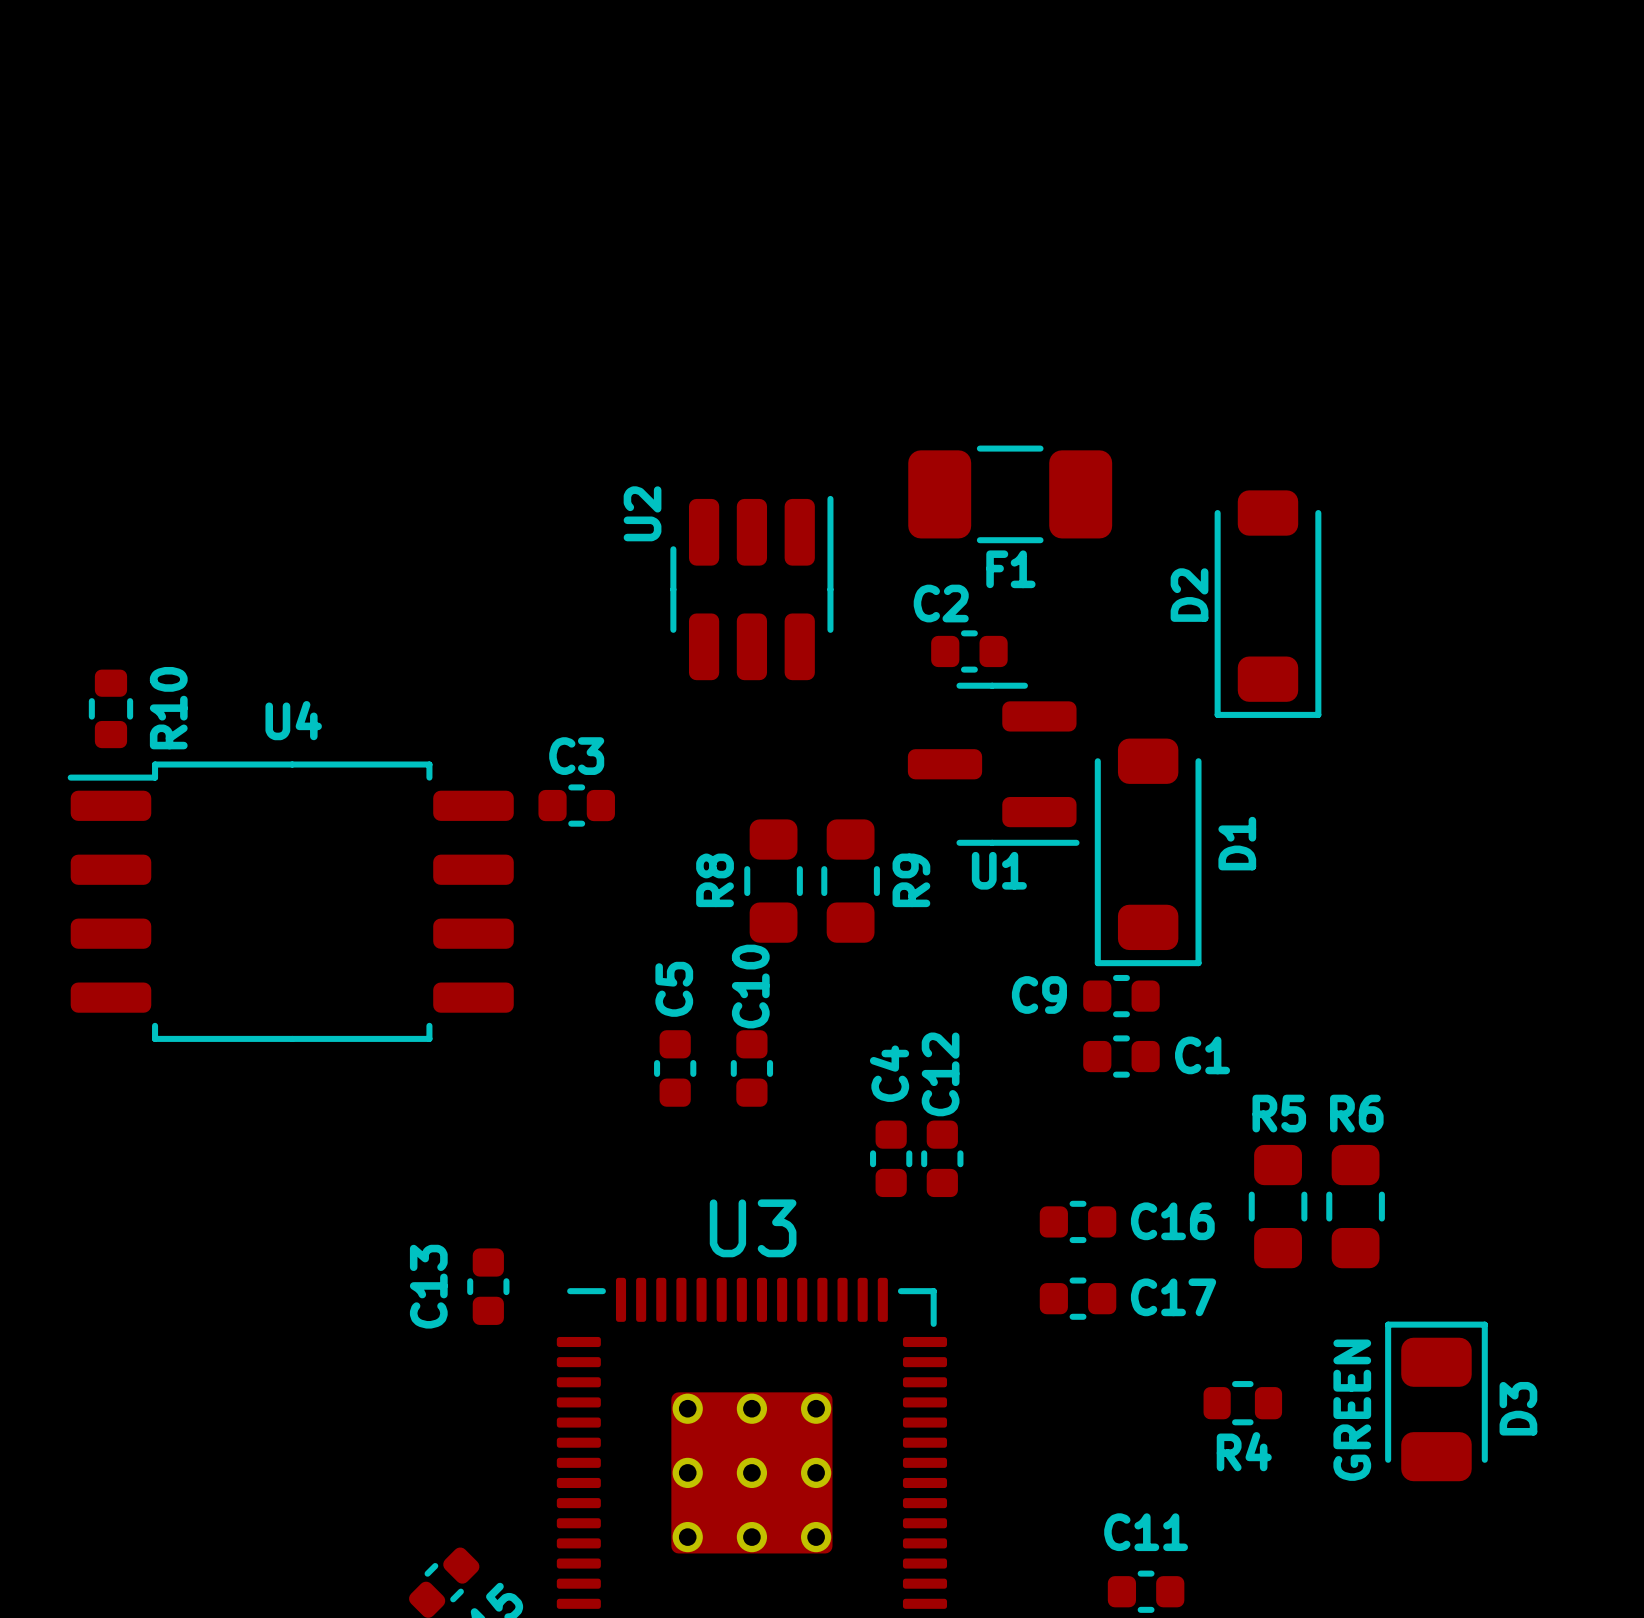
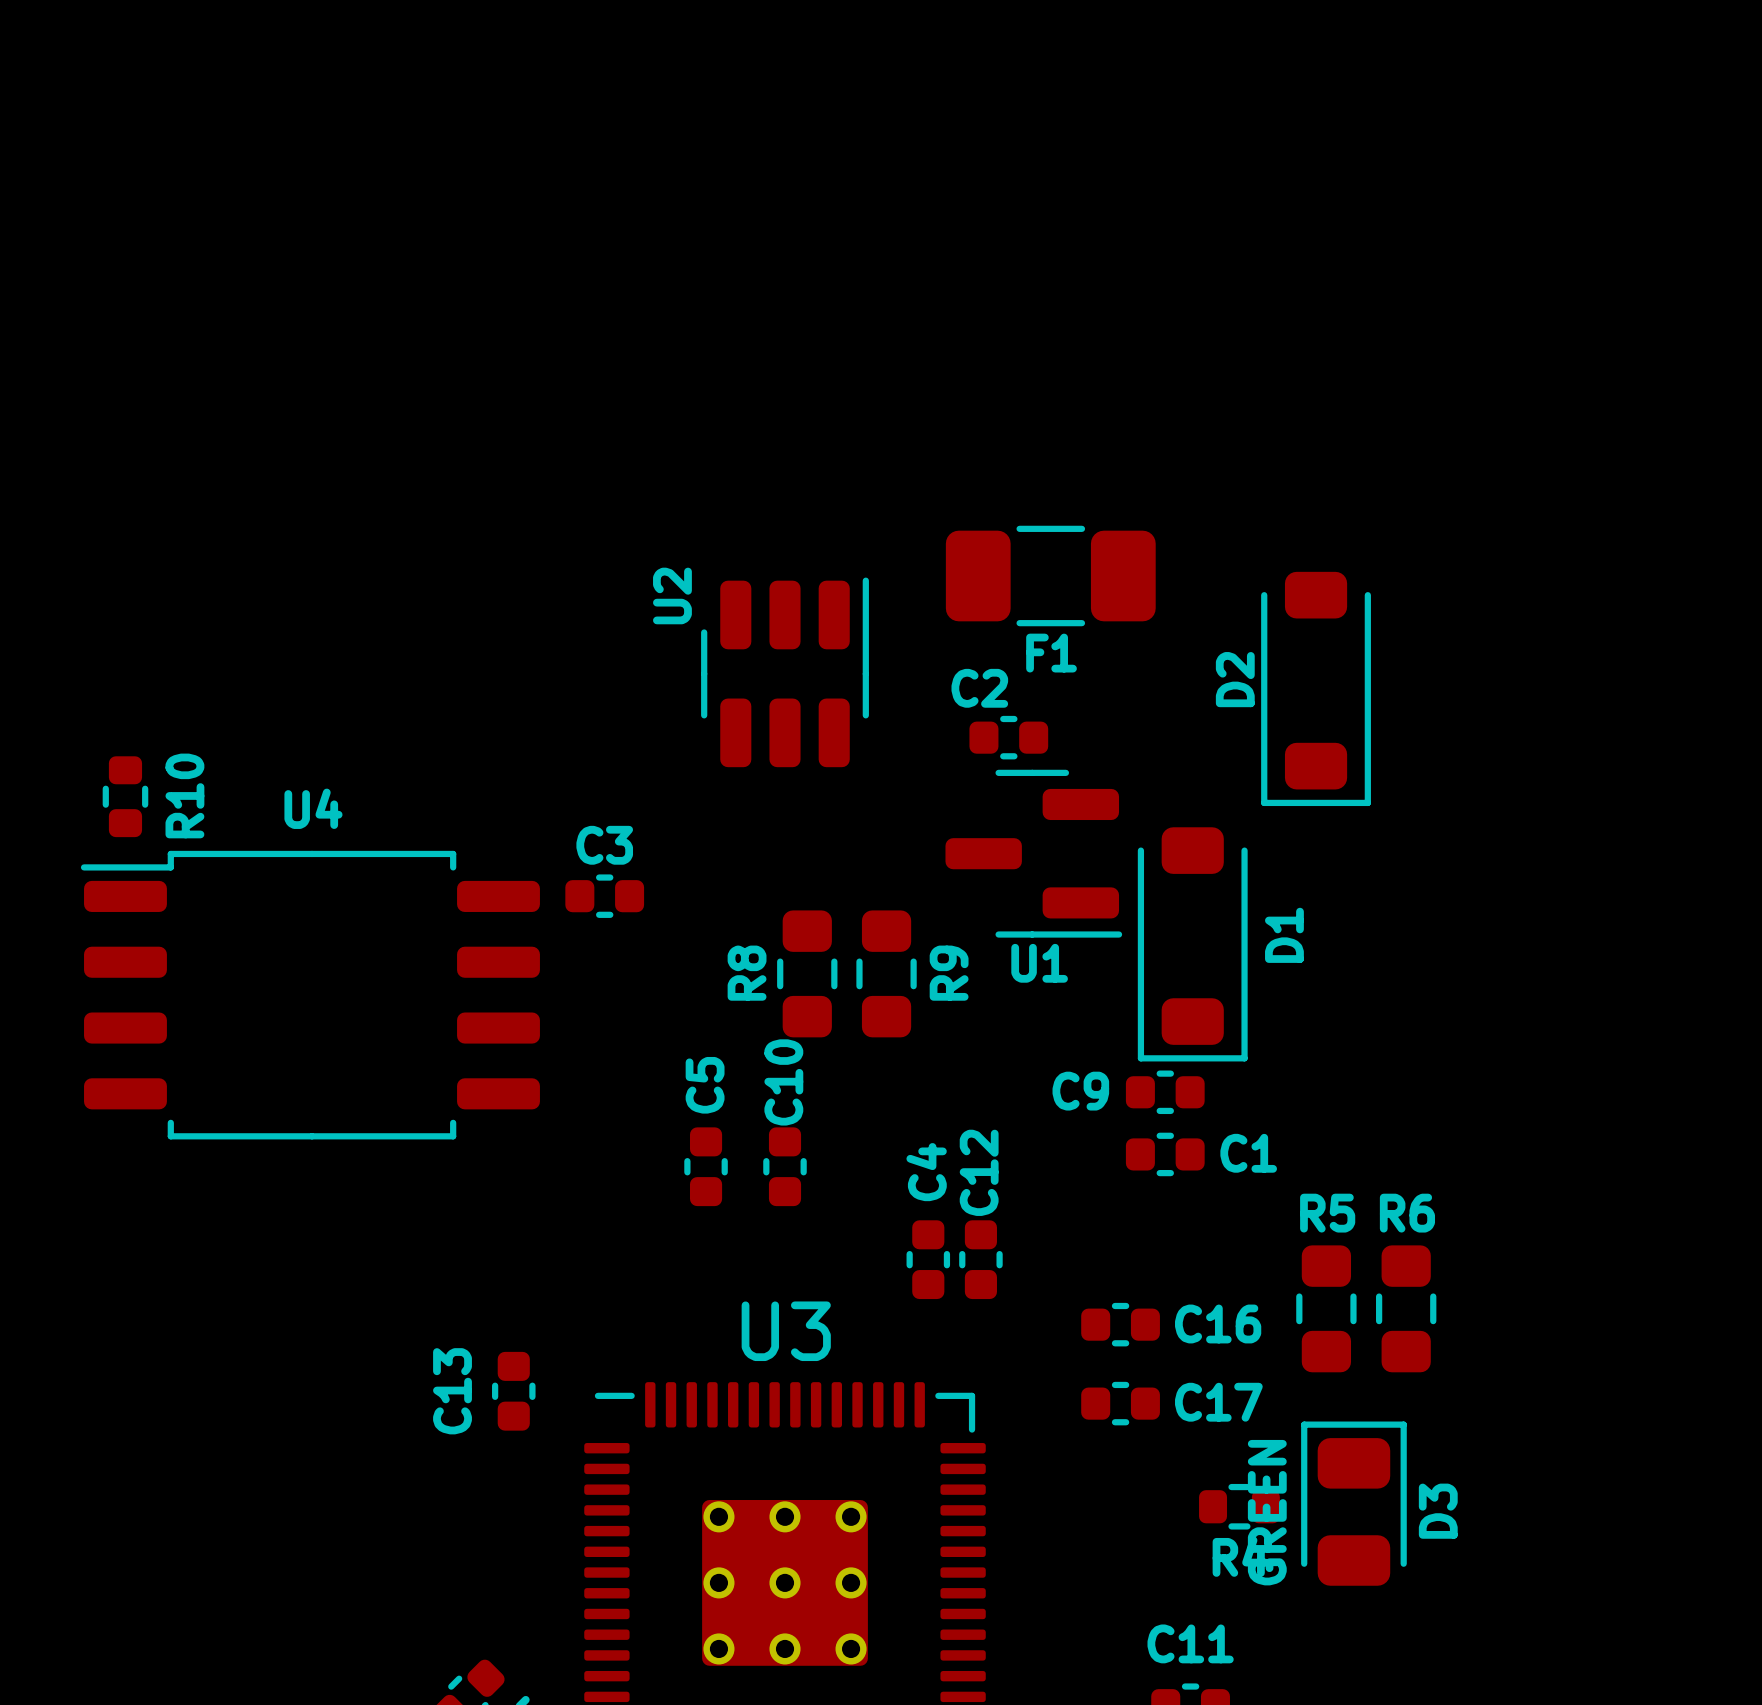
D3 position: (1436, 1401) -> (1353, 1503)
R4 position: (1242, 1403) -> (1239, 1506)

